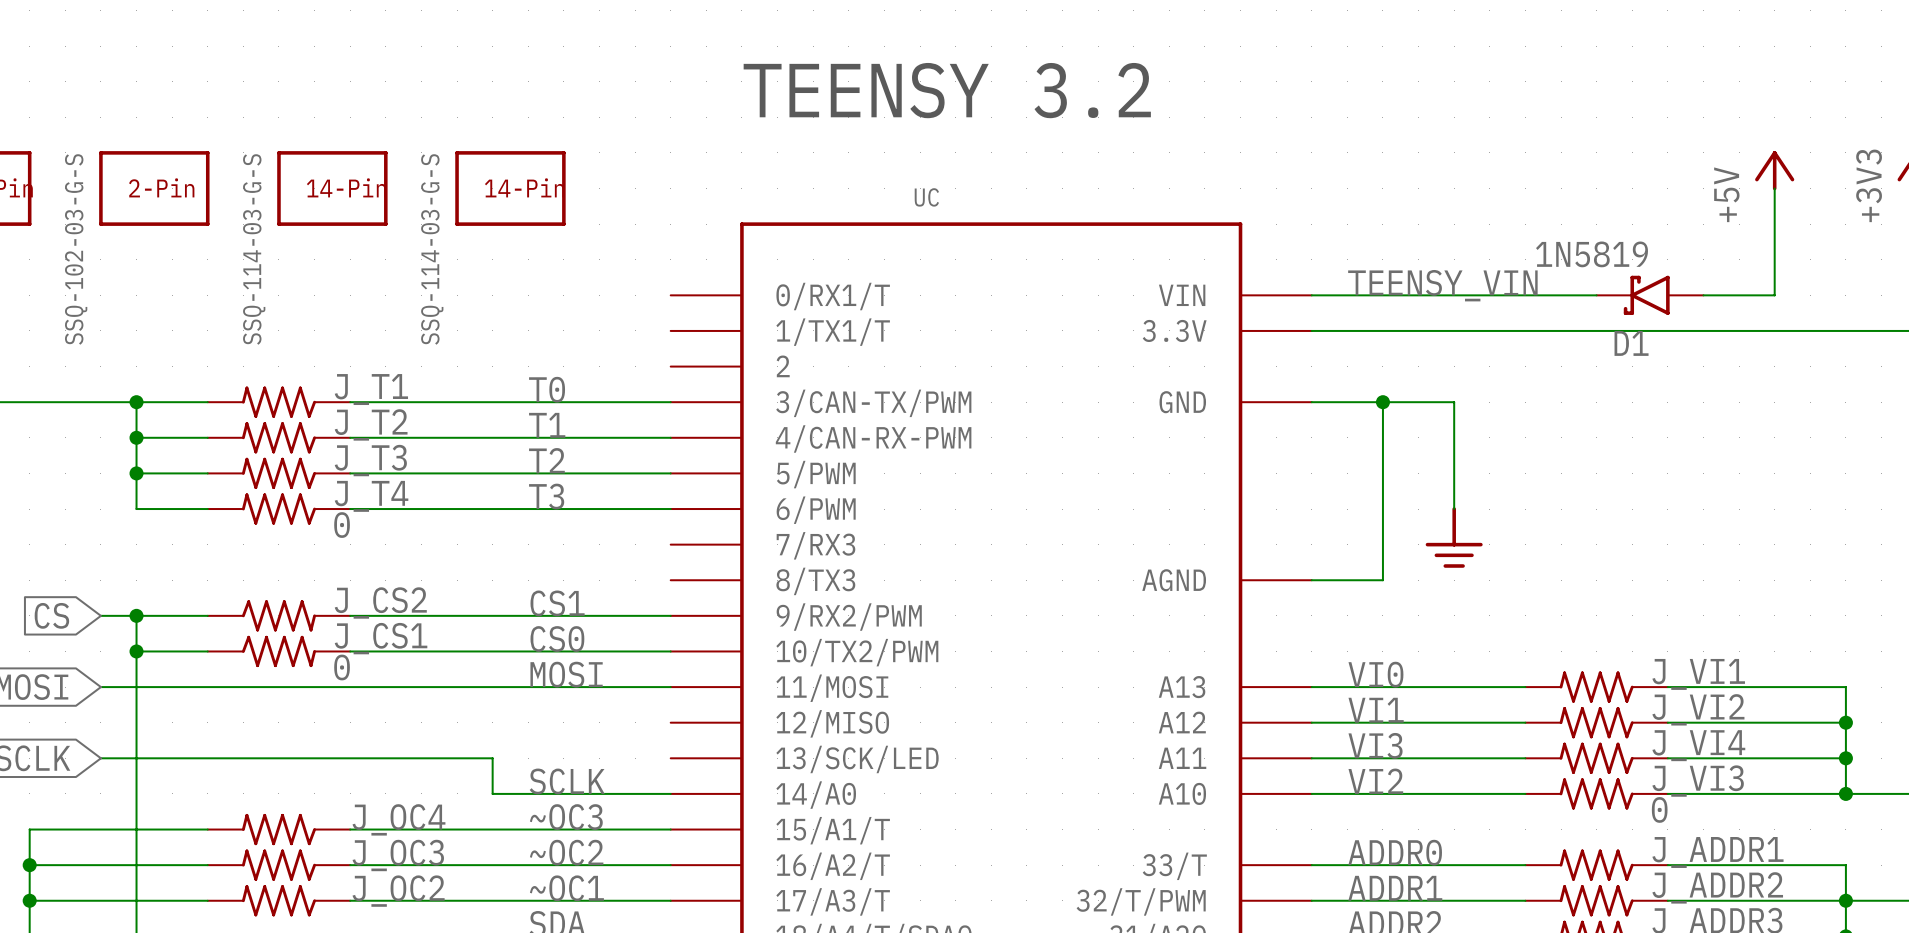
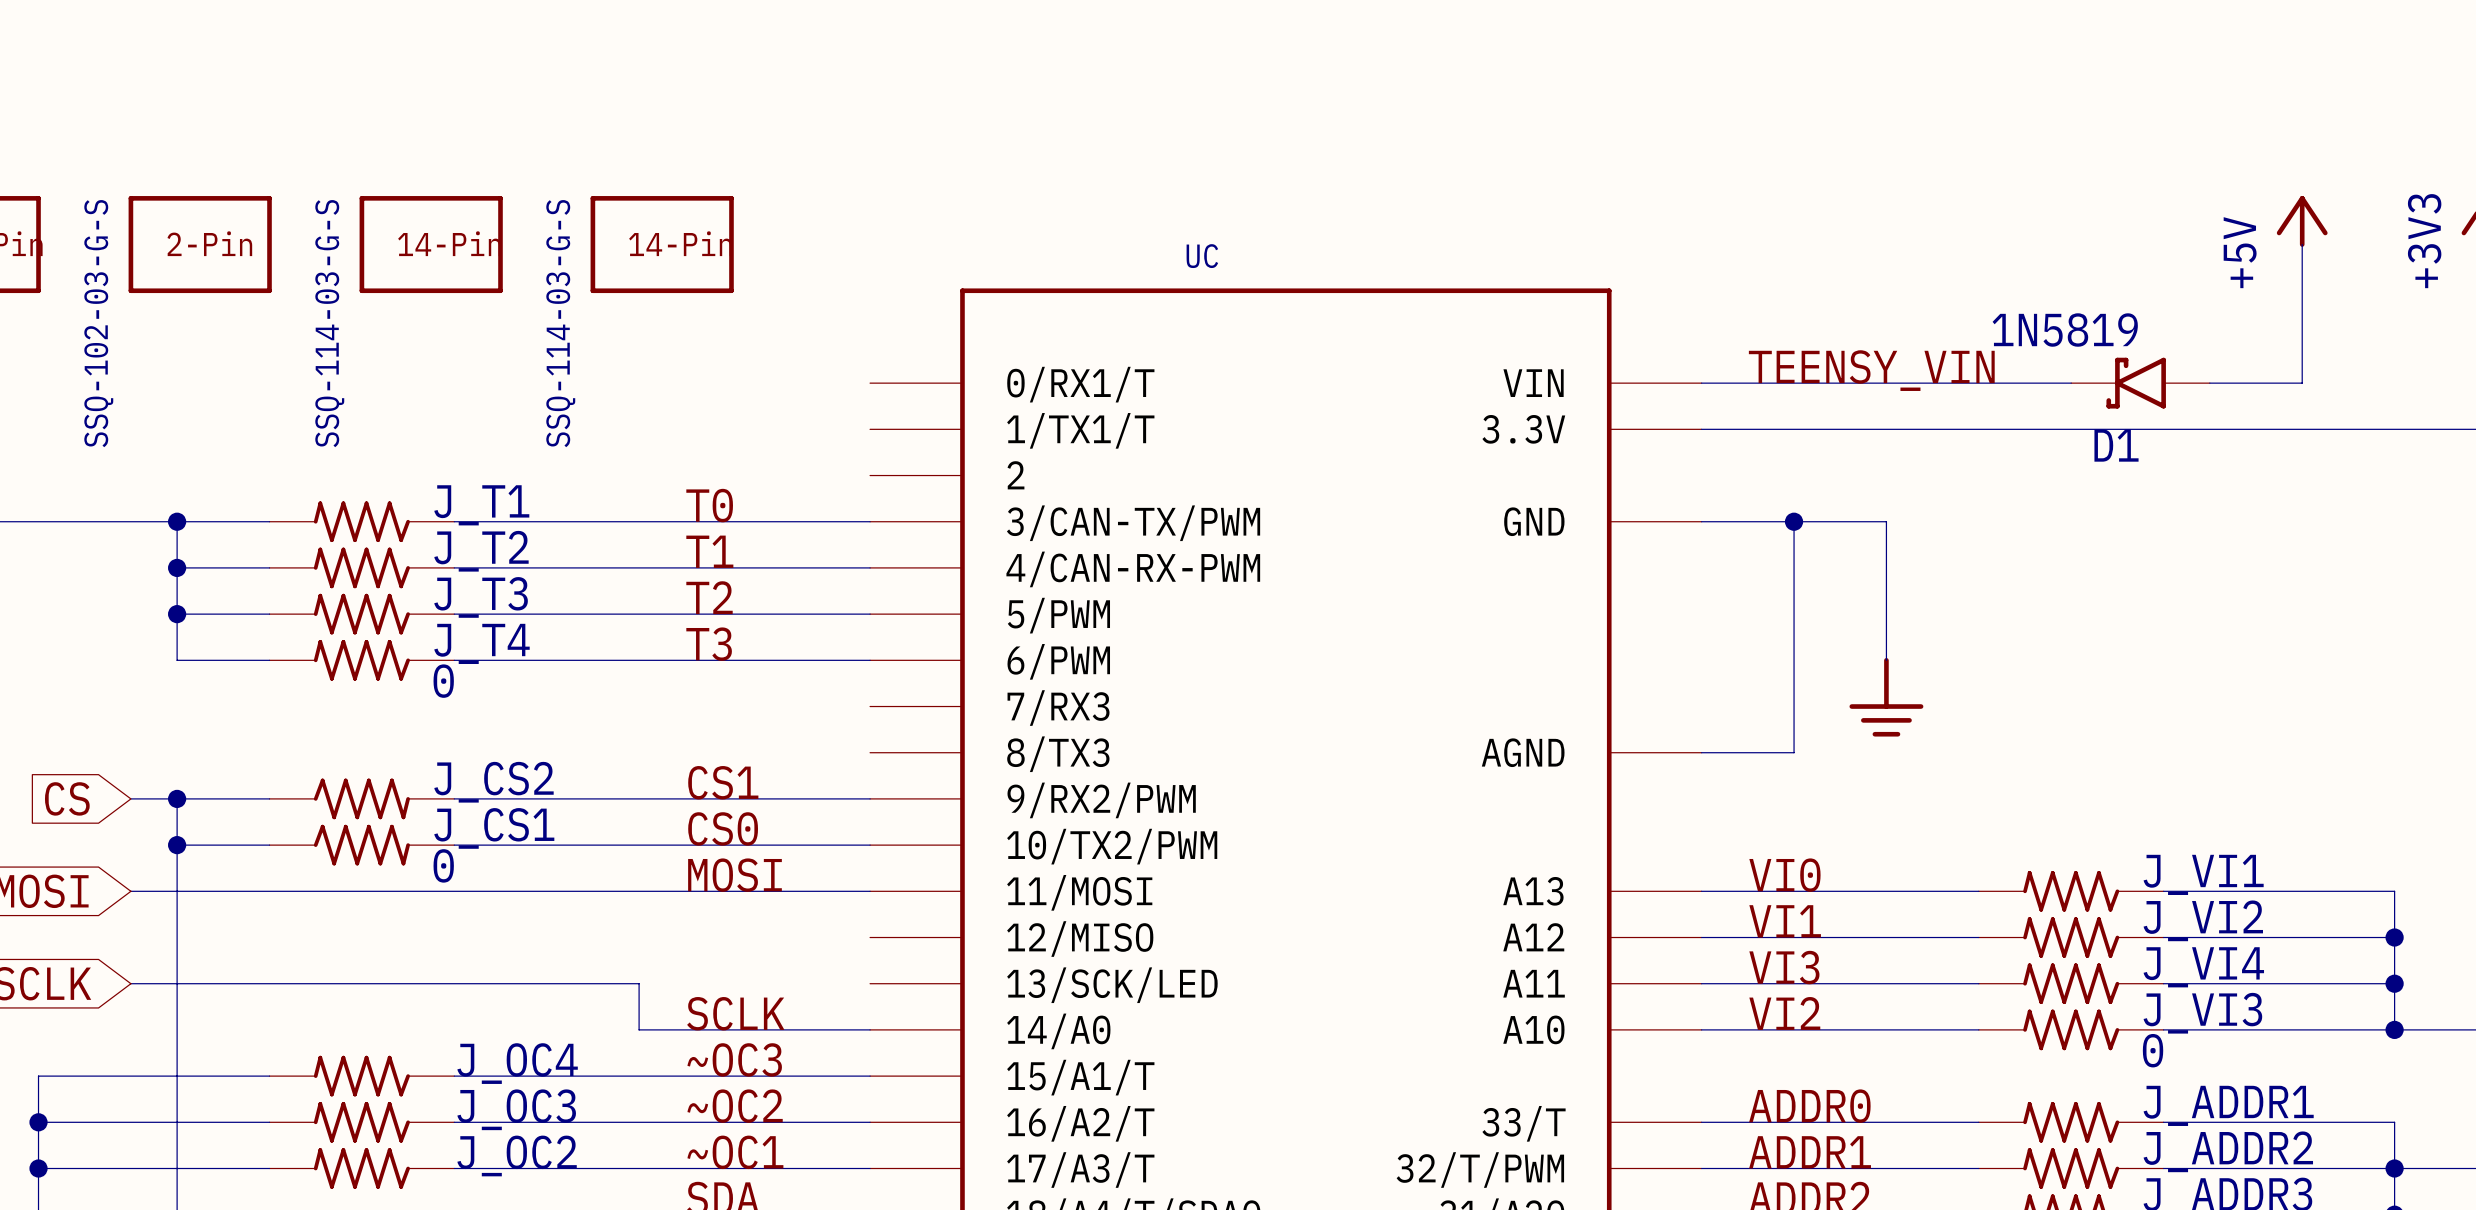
text: TEENSY 3.2 (947, 90) -> none

